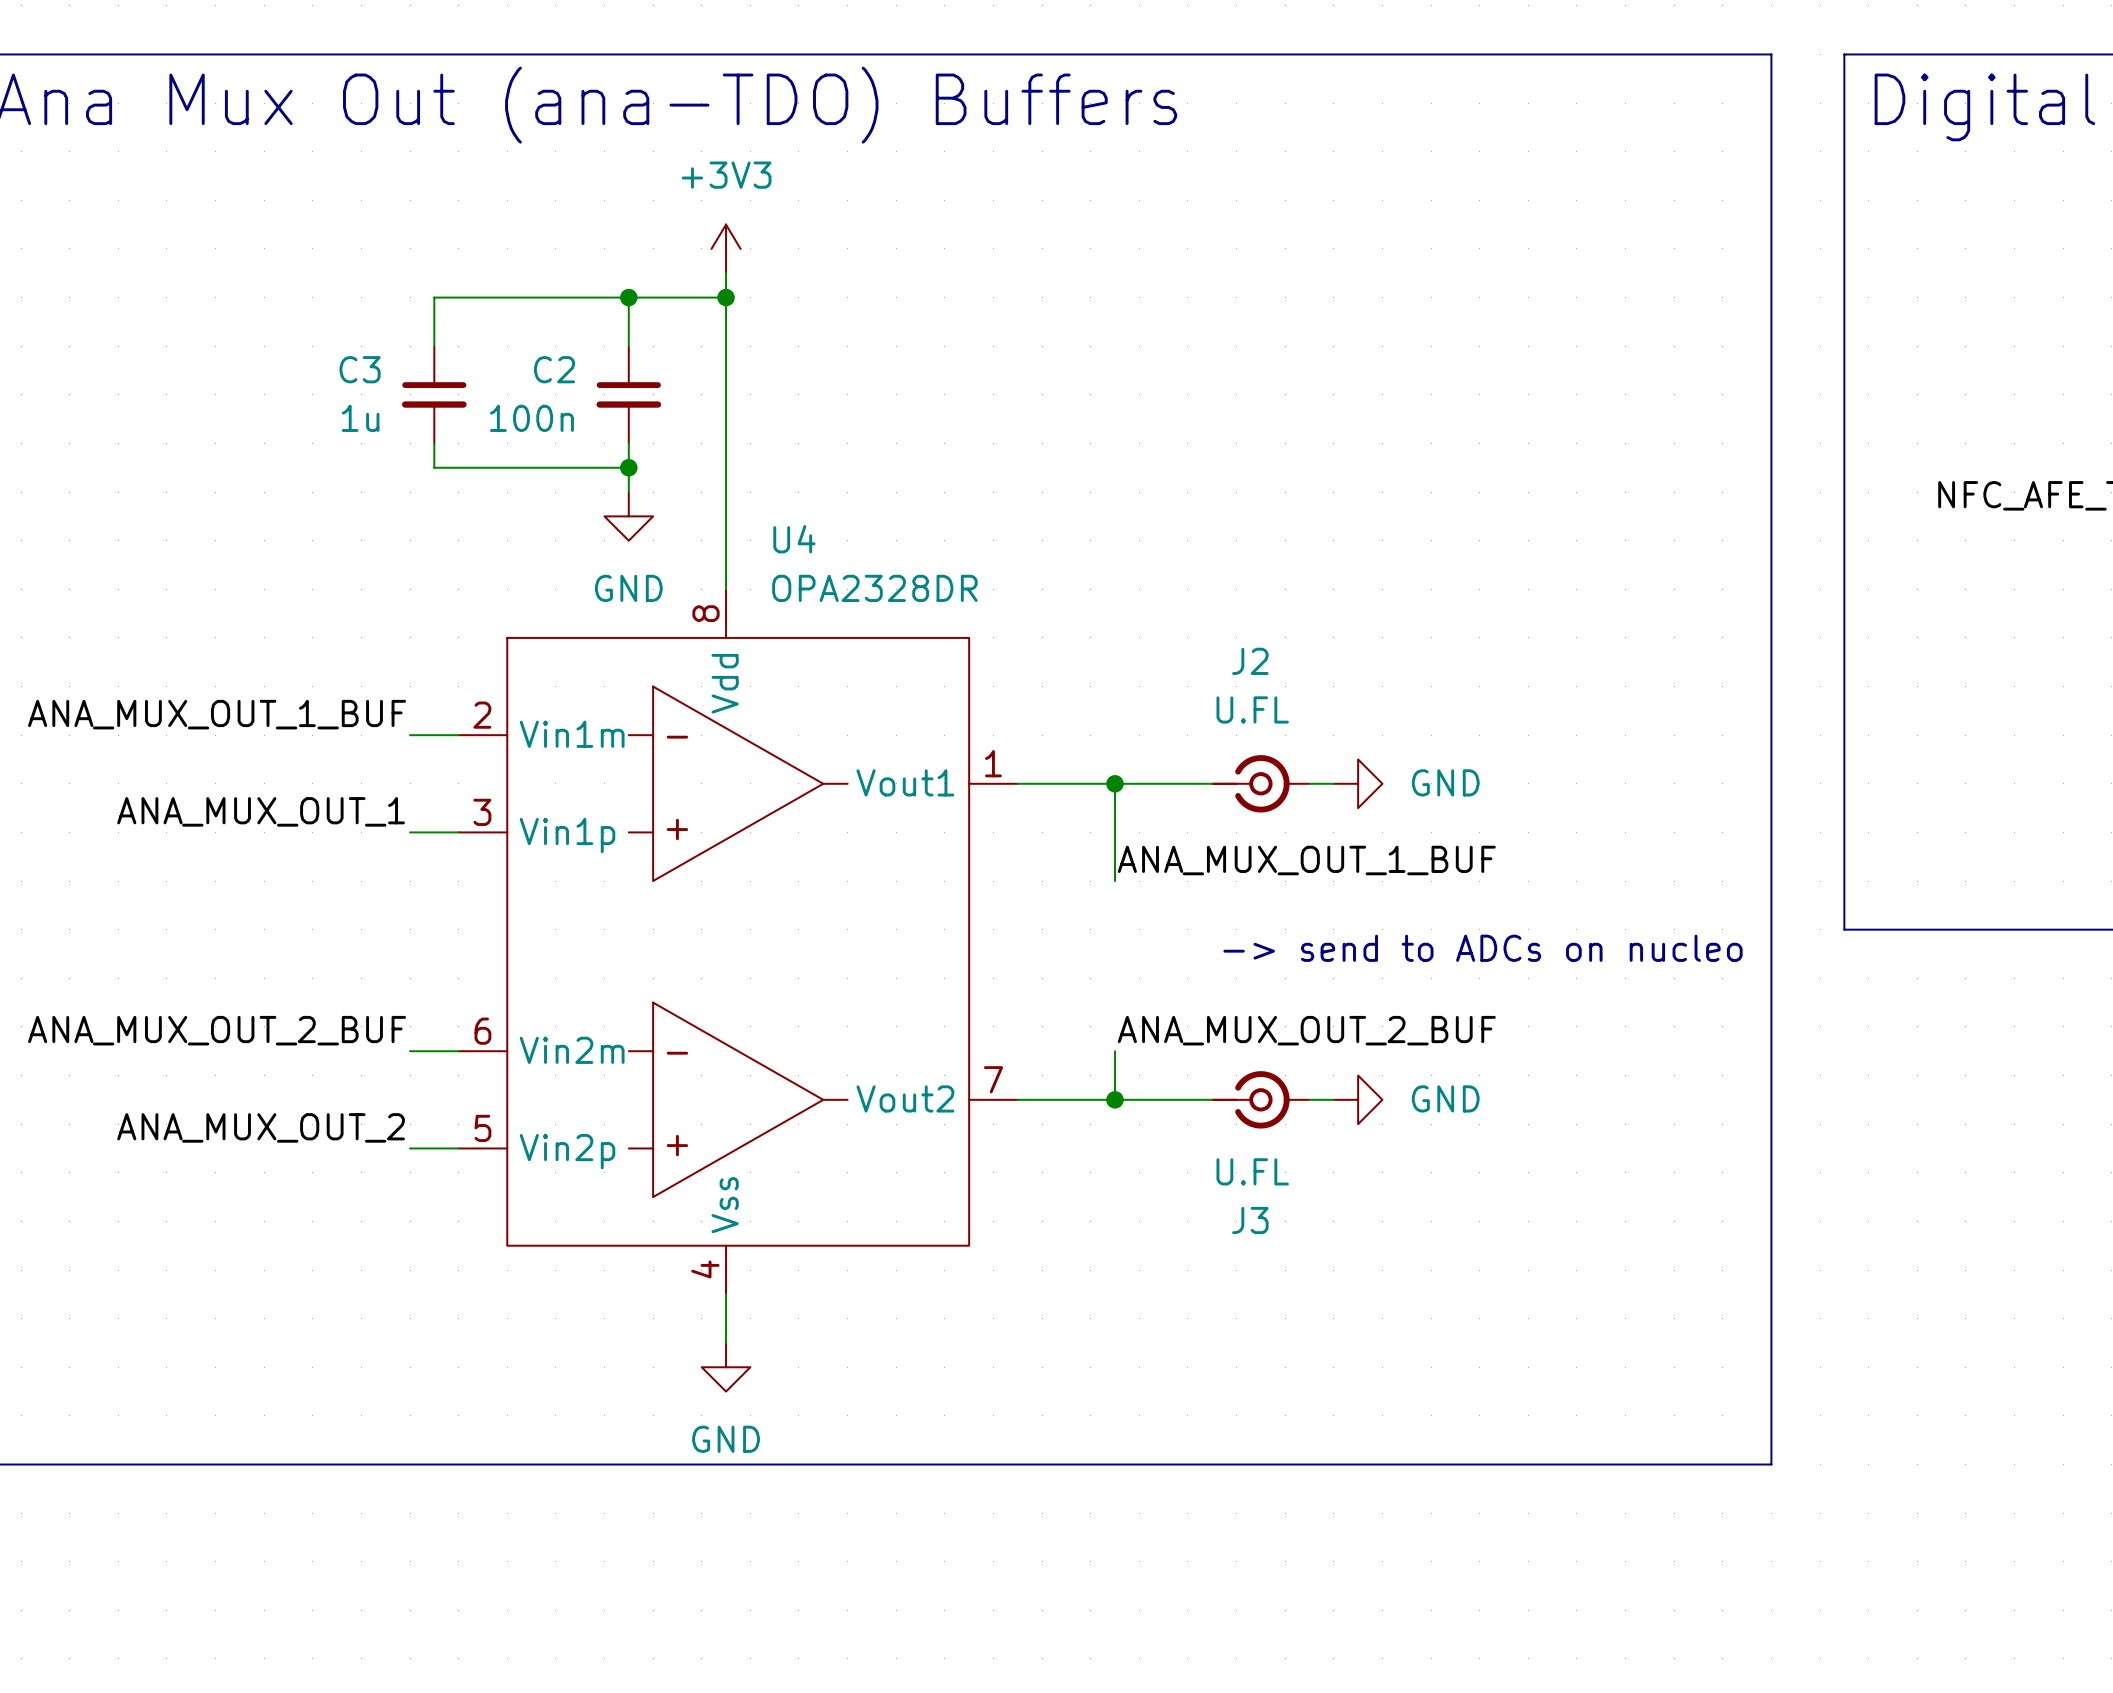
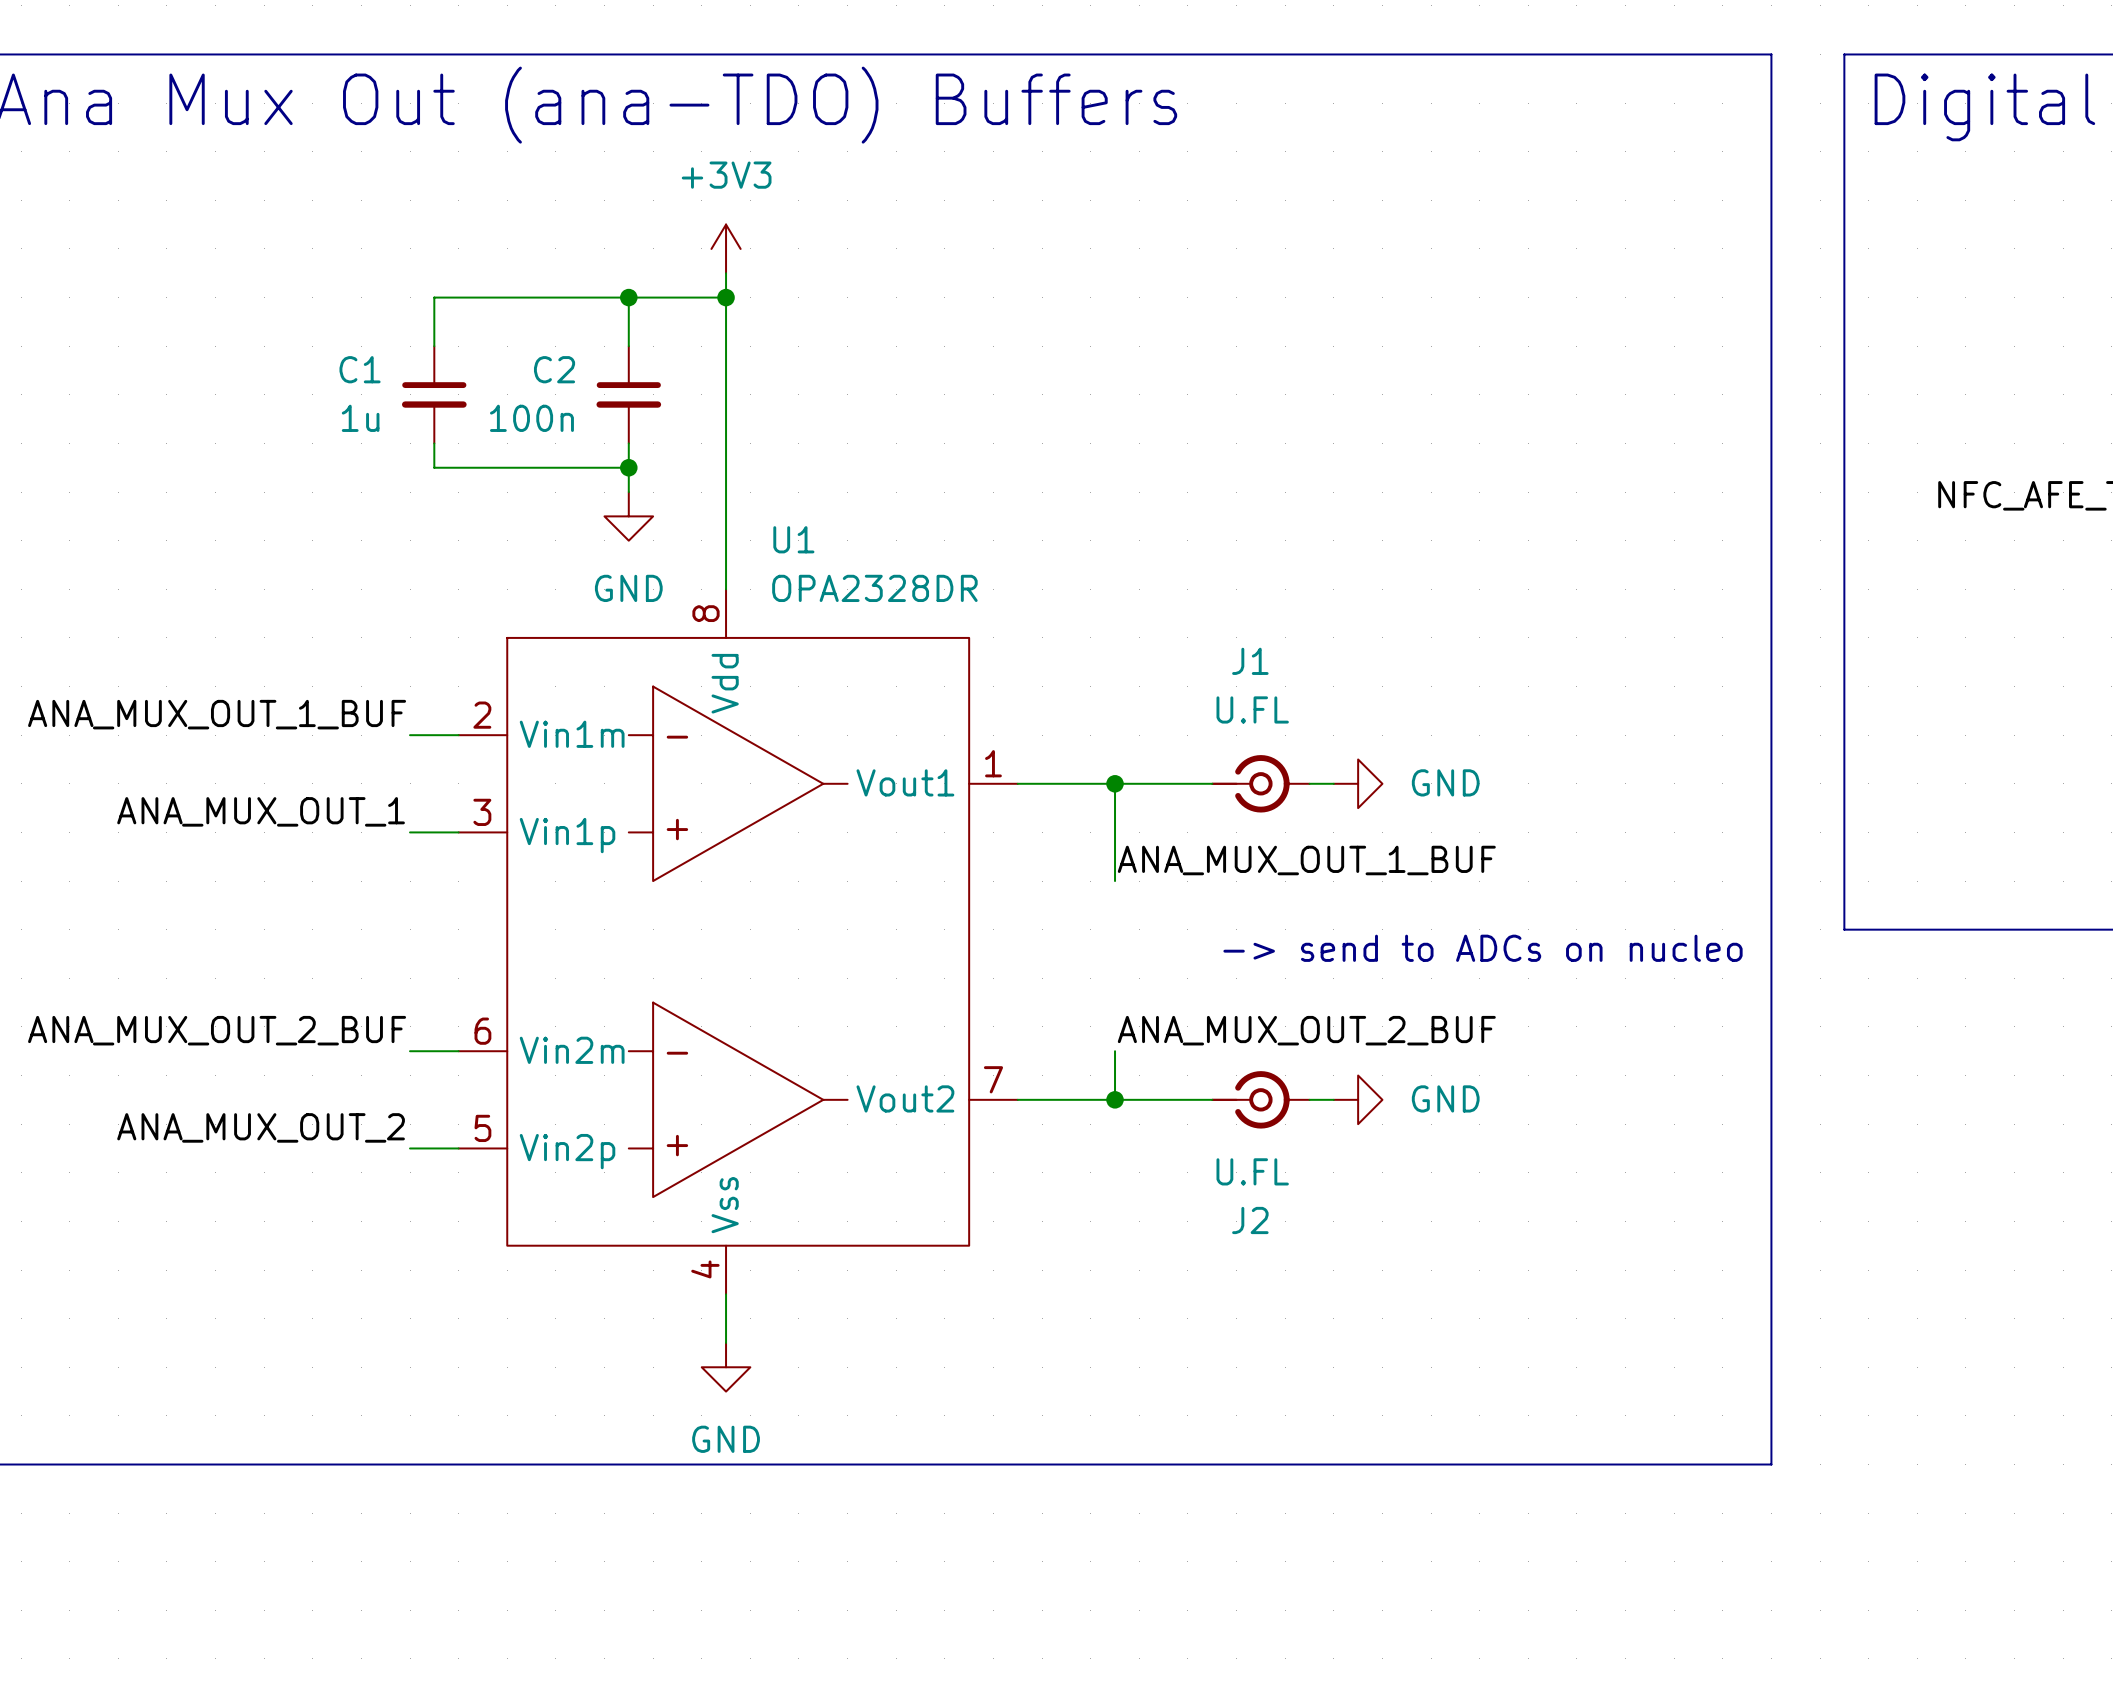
C3 name: C3 (360, 369) -> C1 (360, 369)
U4 name: U4 (794, 539) -> U1 (793, 539)
J2 name: J2 (1250, 661) -> J1 (1250, 661)
J3 name: J3 (1250, 1220) -> J2 (1250, 1220)

